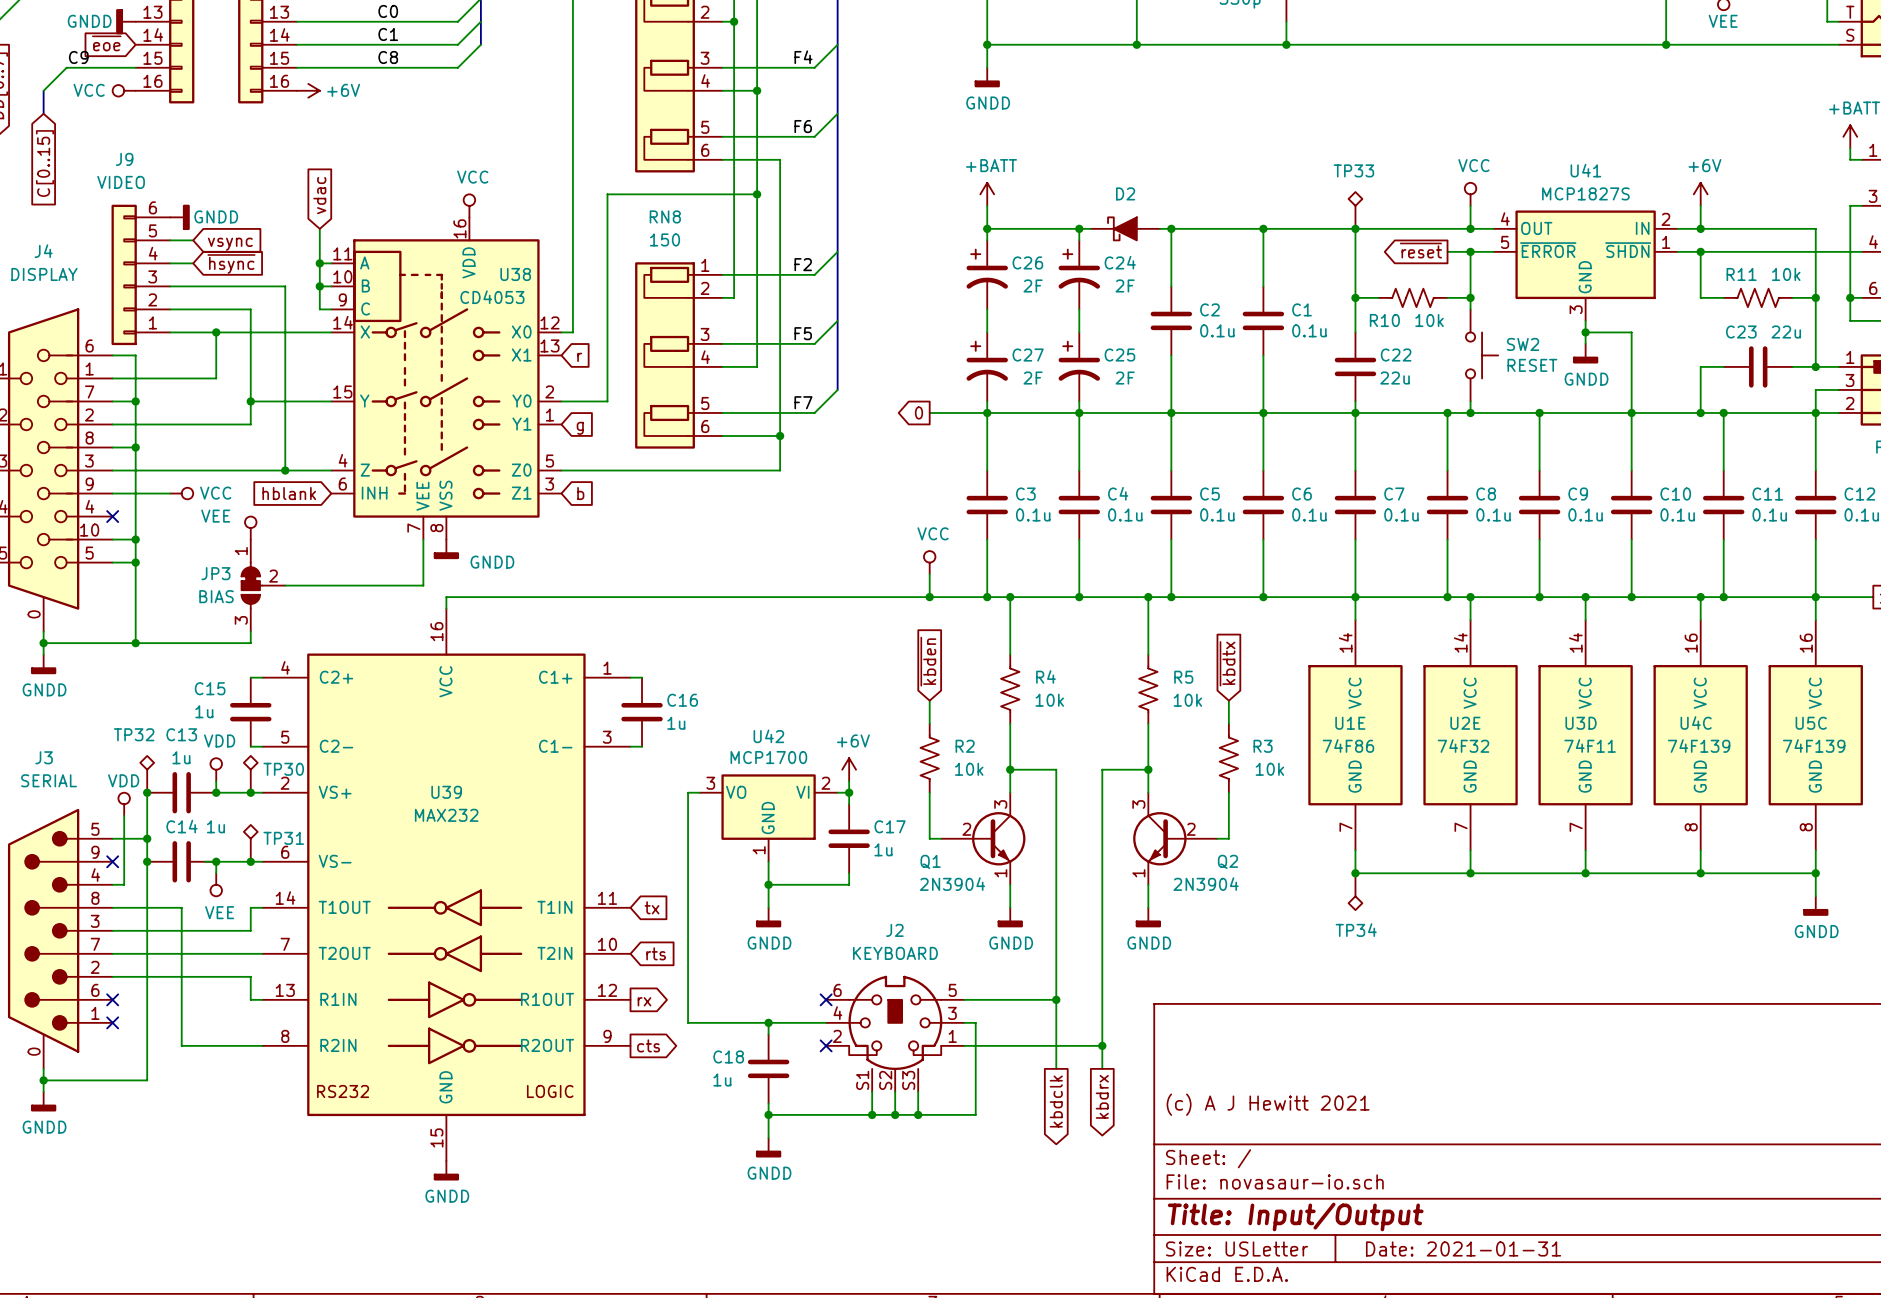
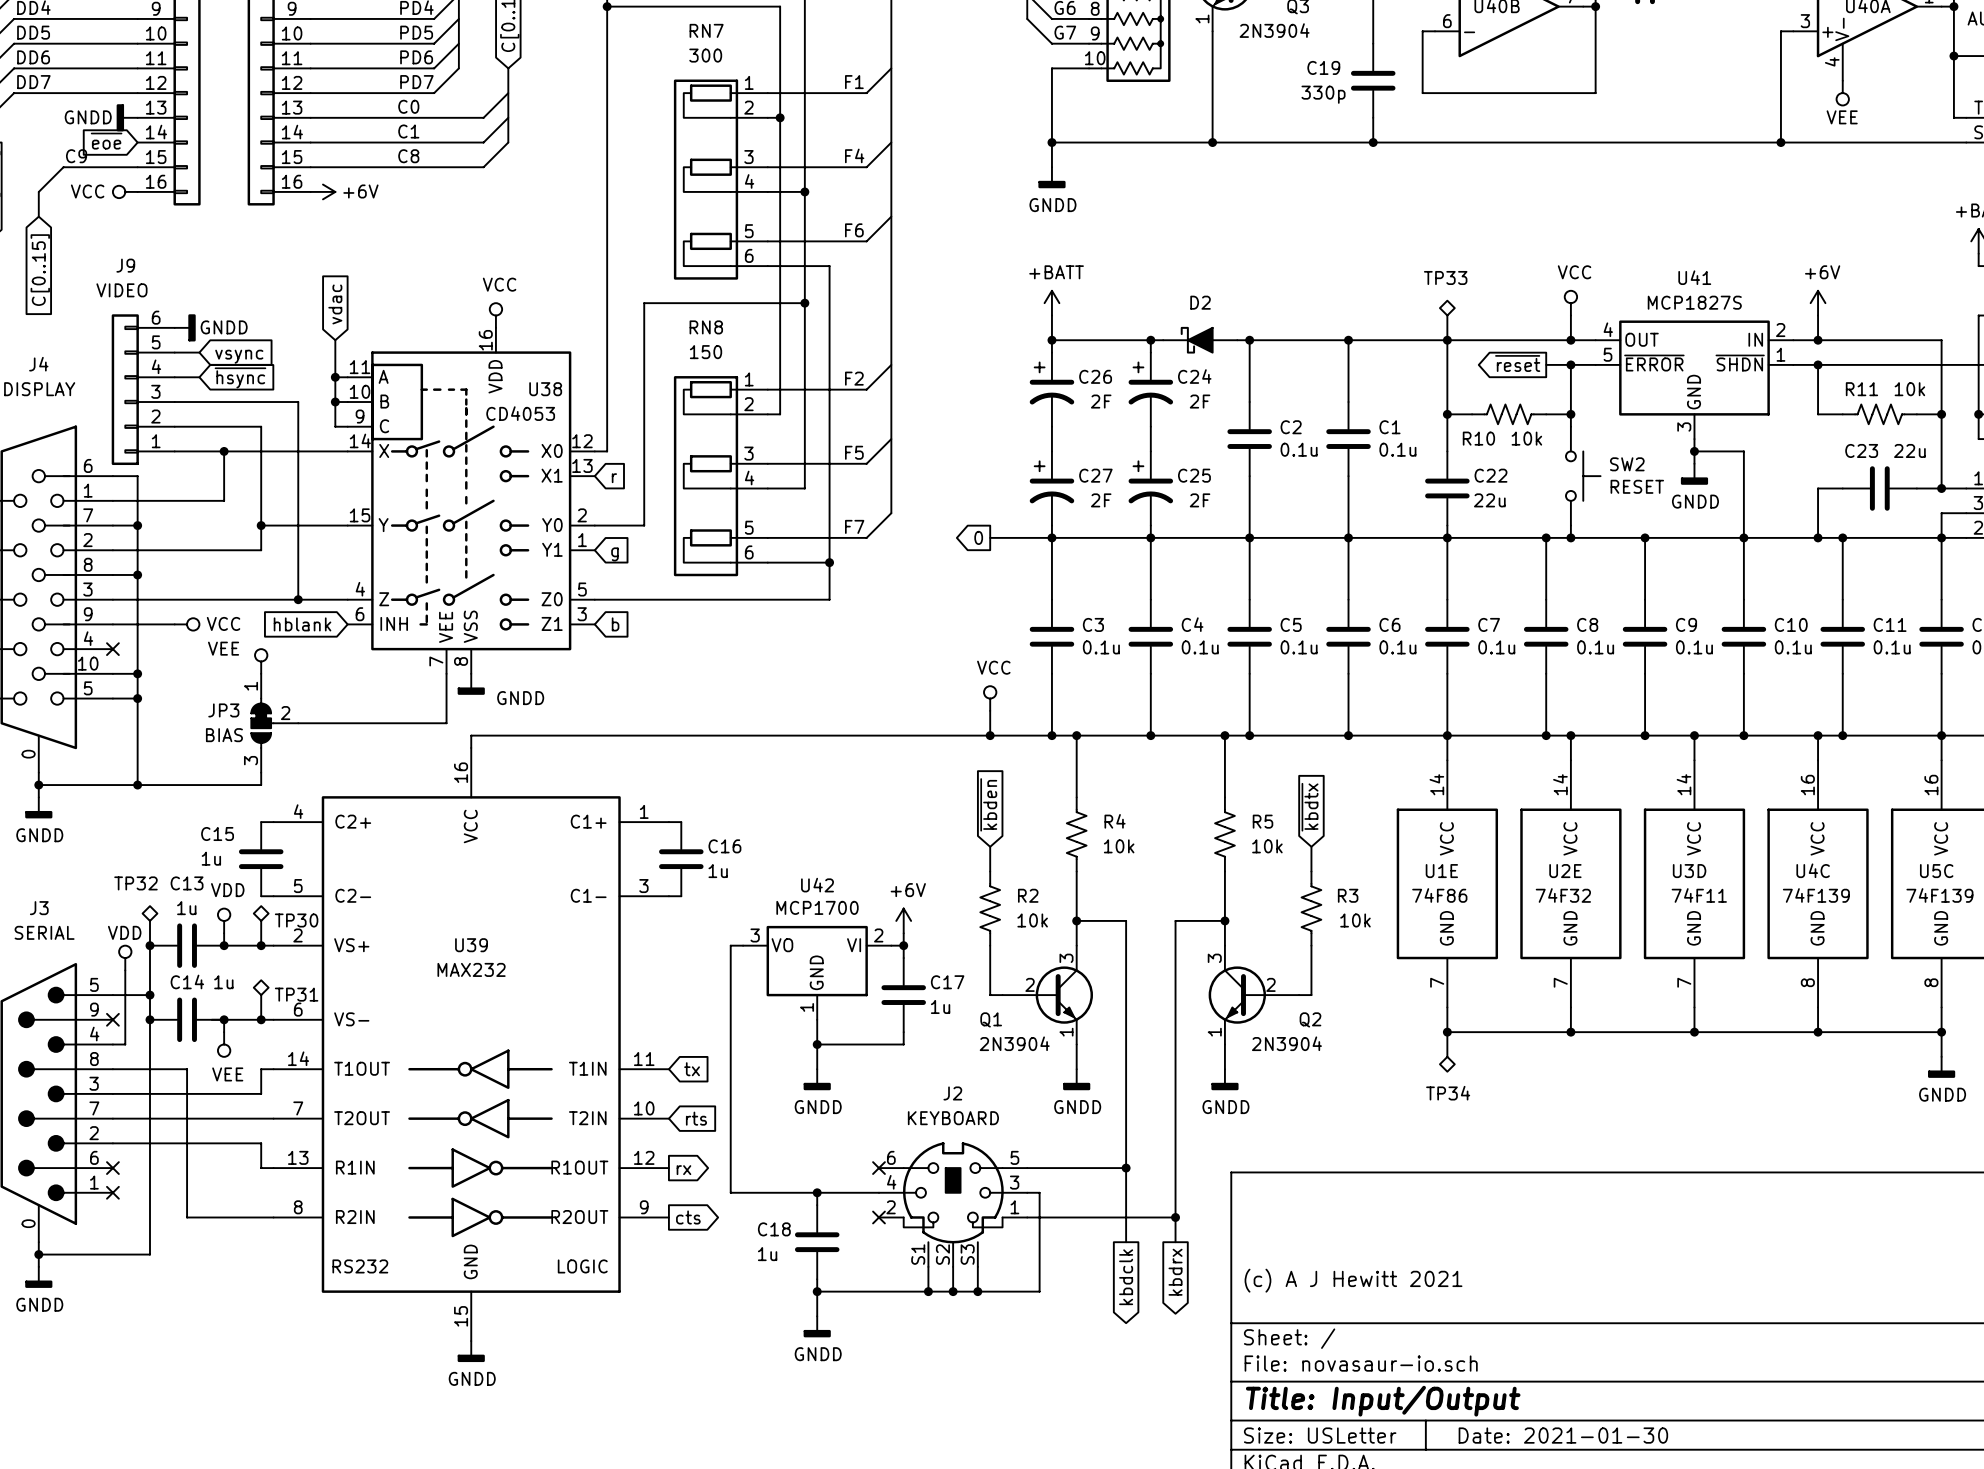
title block: Date: 2021-01-31 (1463, 1248) -> Date: 2021-01-30 (1563, 1435)

